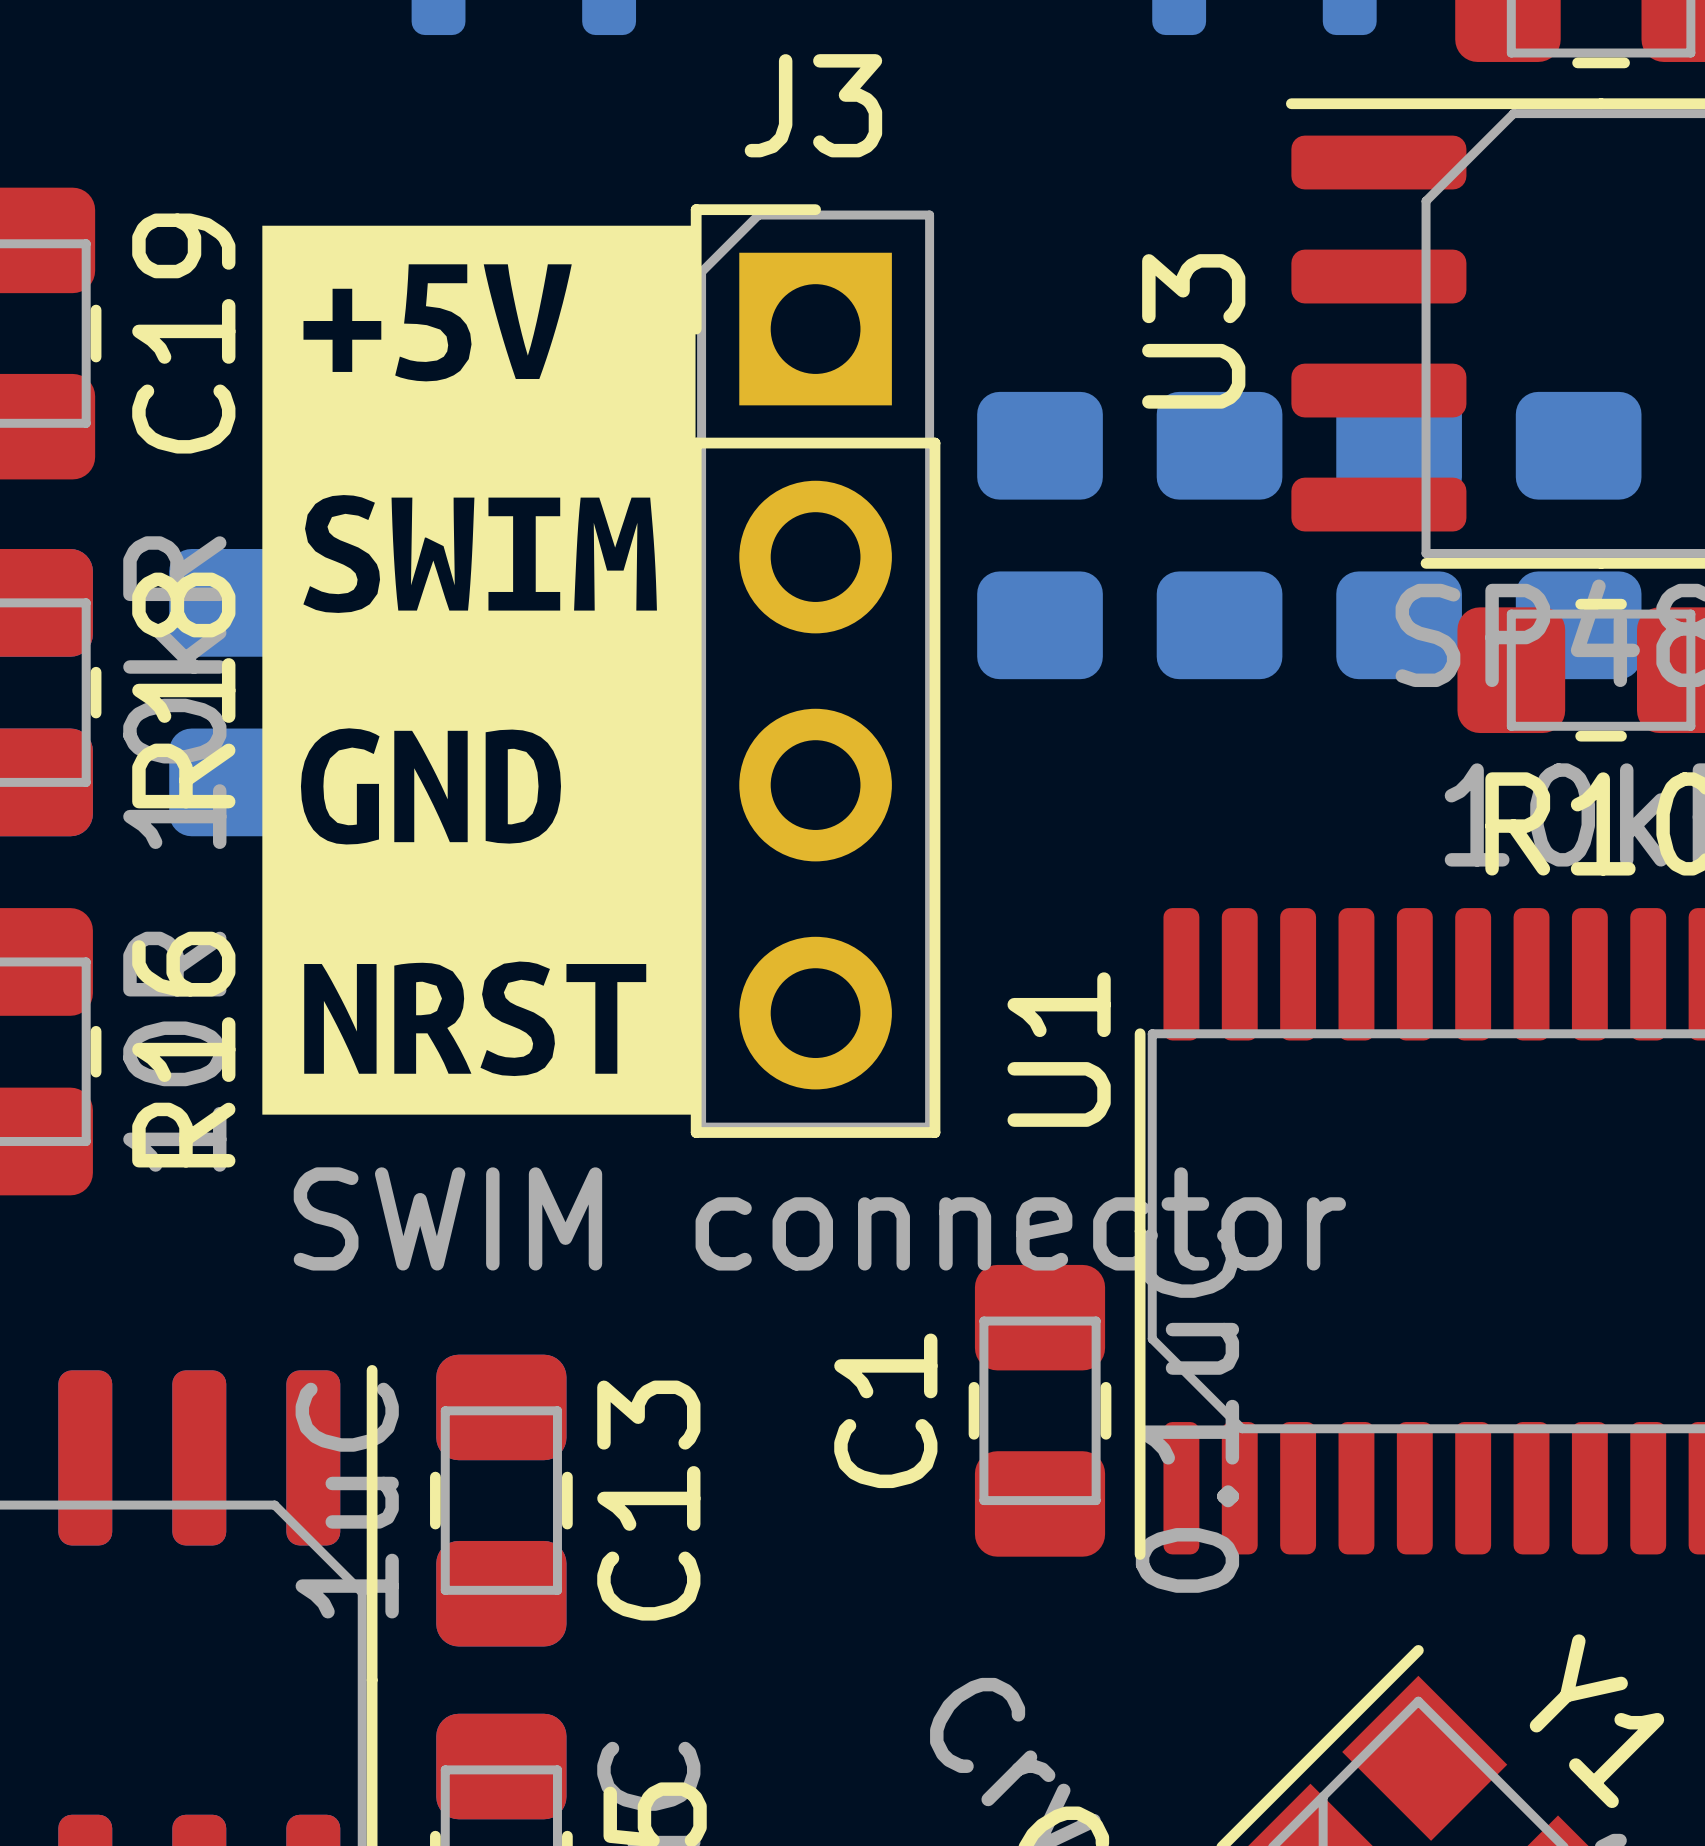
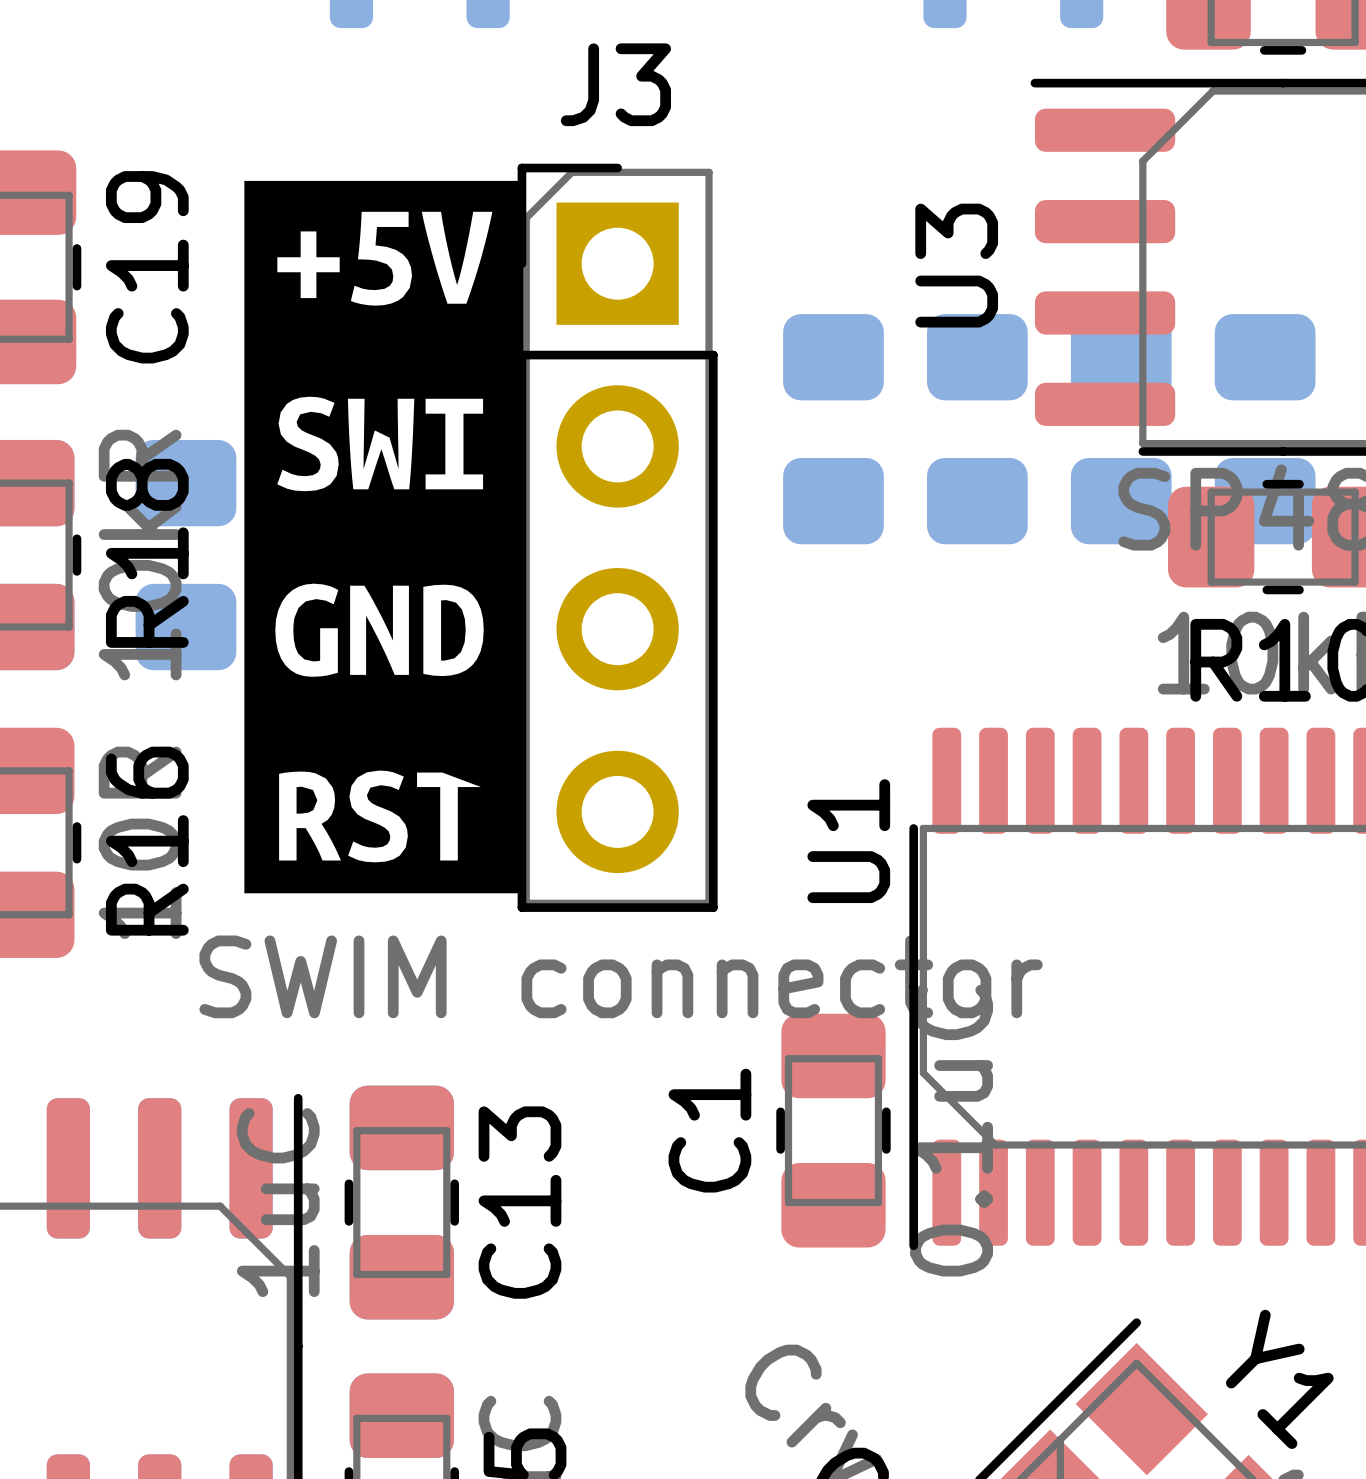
drawing shape: [262, 225, 696, 1115] -> [244, 180, 524, 894]
J3 position: (815, 671) -> (617, 537)

